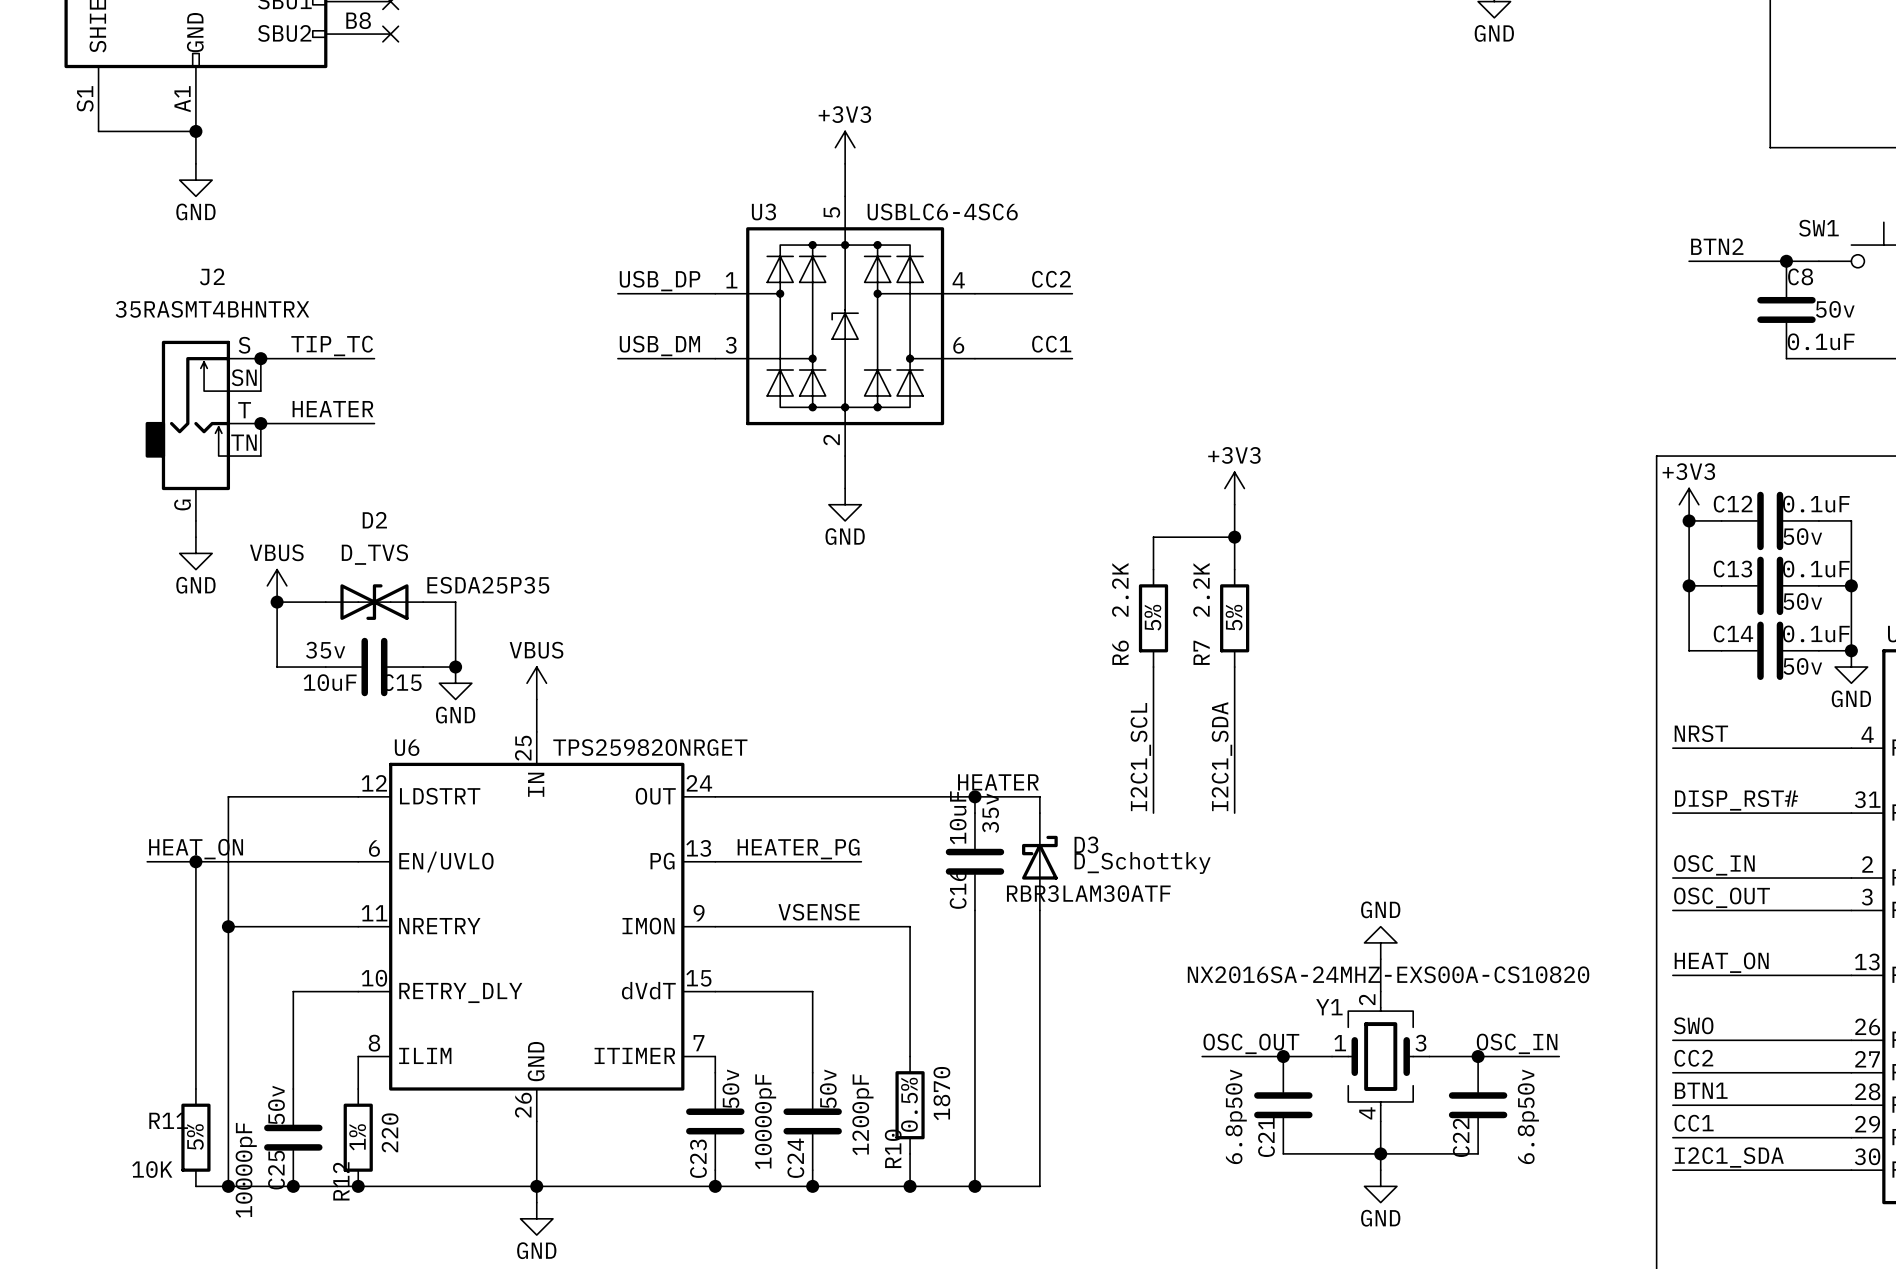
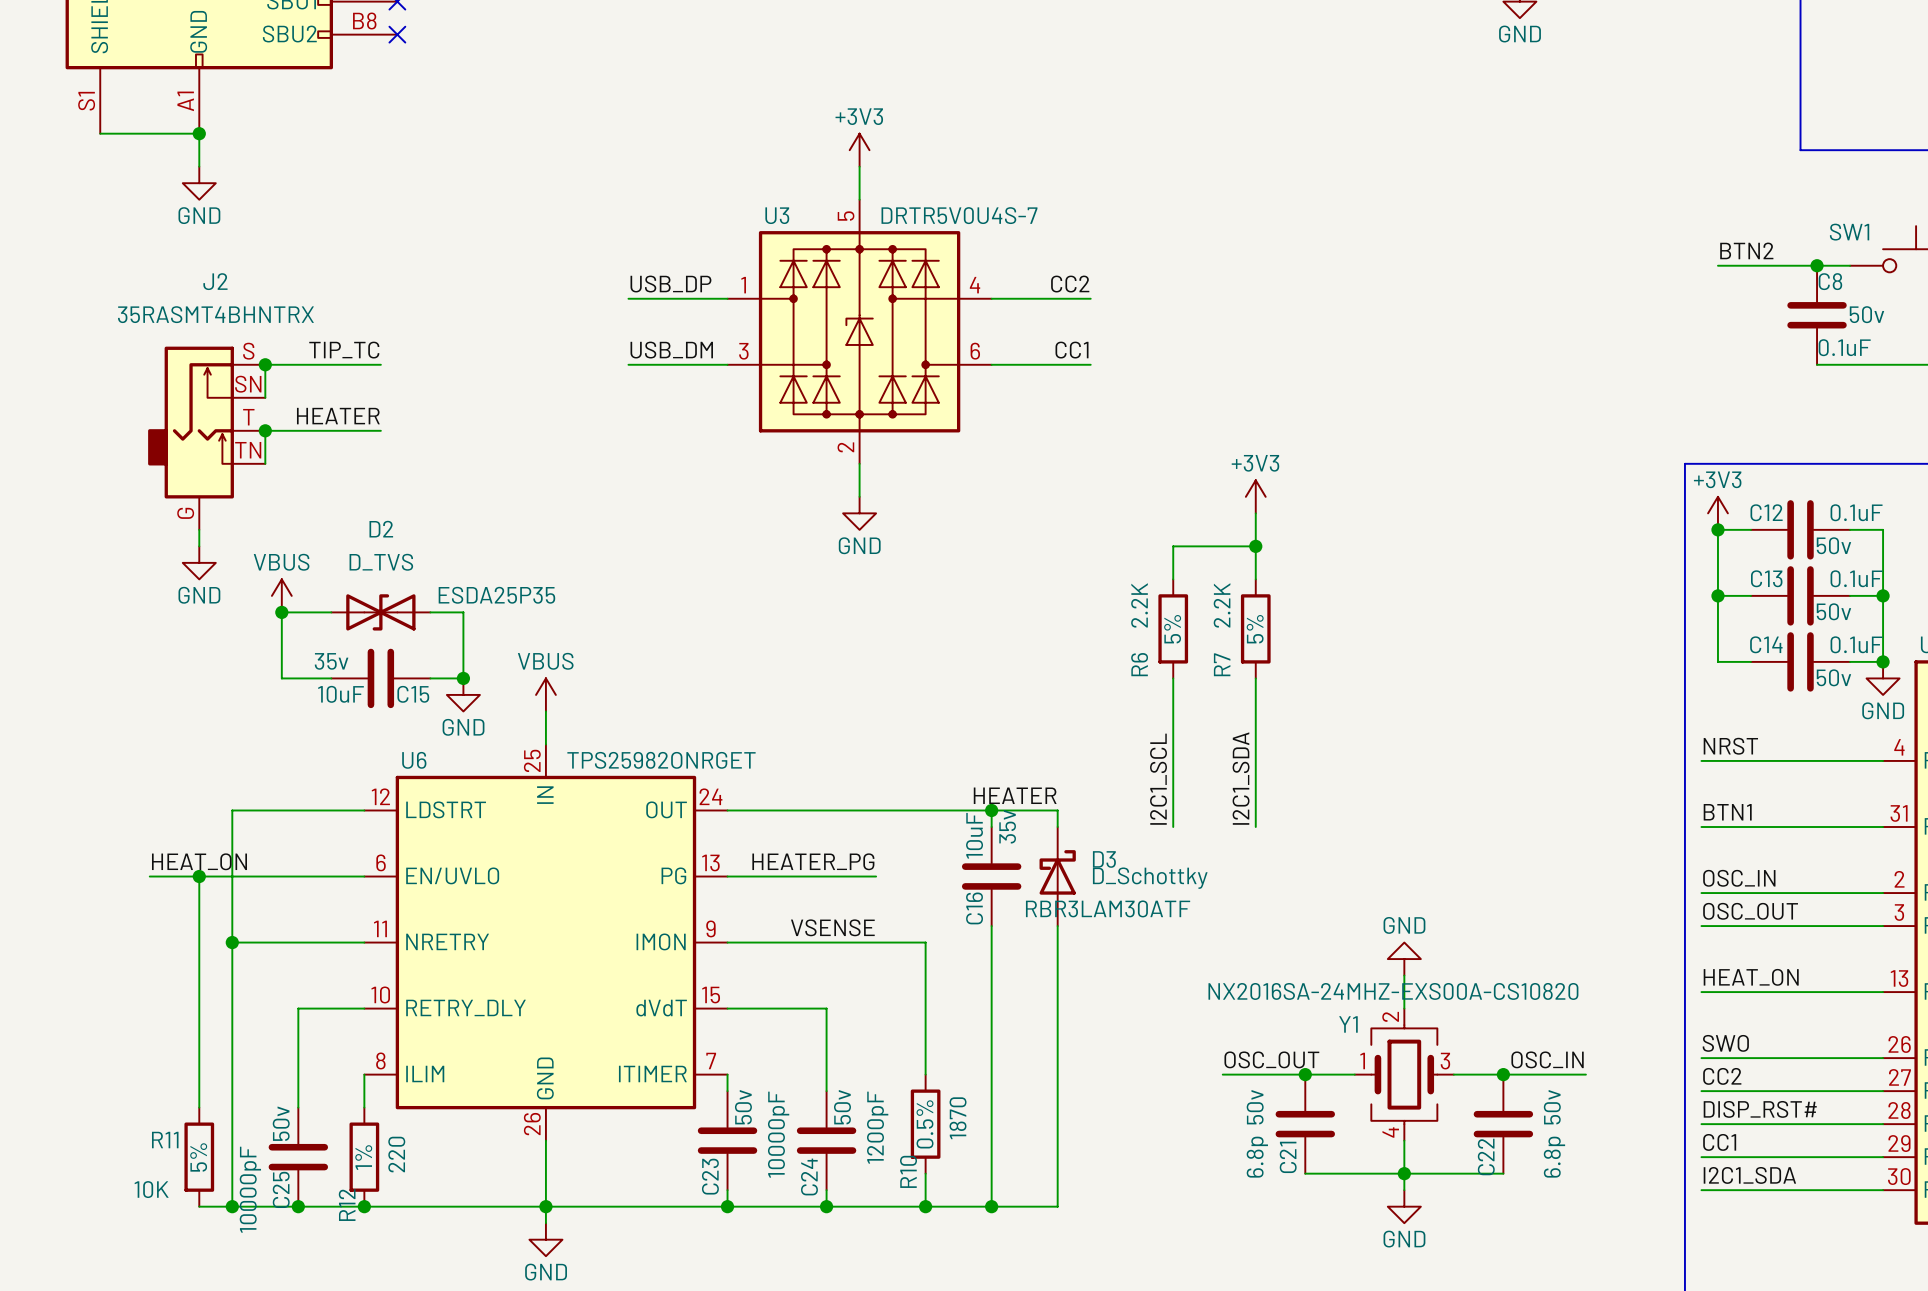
U3 value: USBLC6-4SC6 (942, 211) -> DRTR5V0U4S-7 (959, 215)
label: DISP_RST# (1736, 800) -> BTN1 (1727, 812)
label: BTN1 (1701, 1090) -> DISP_RST# (1760, 1109)

